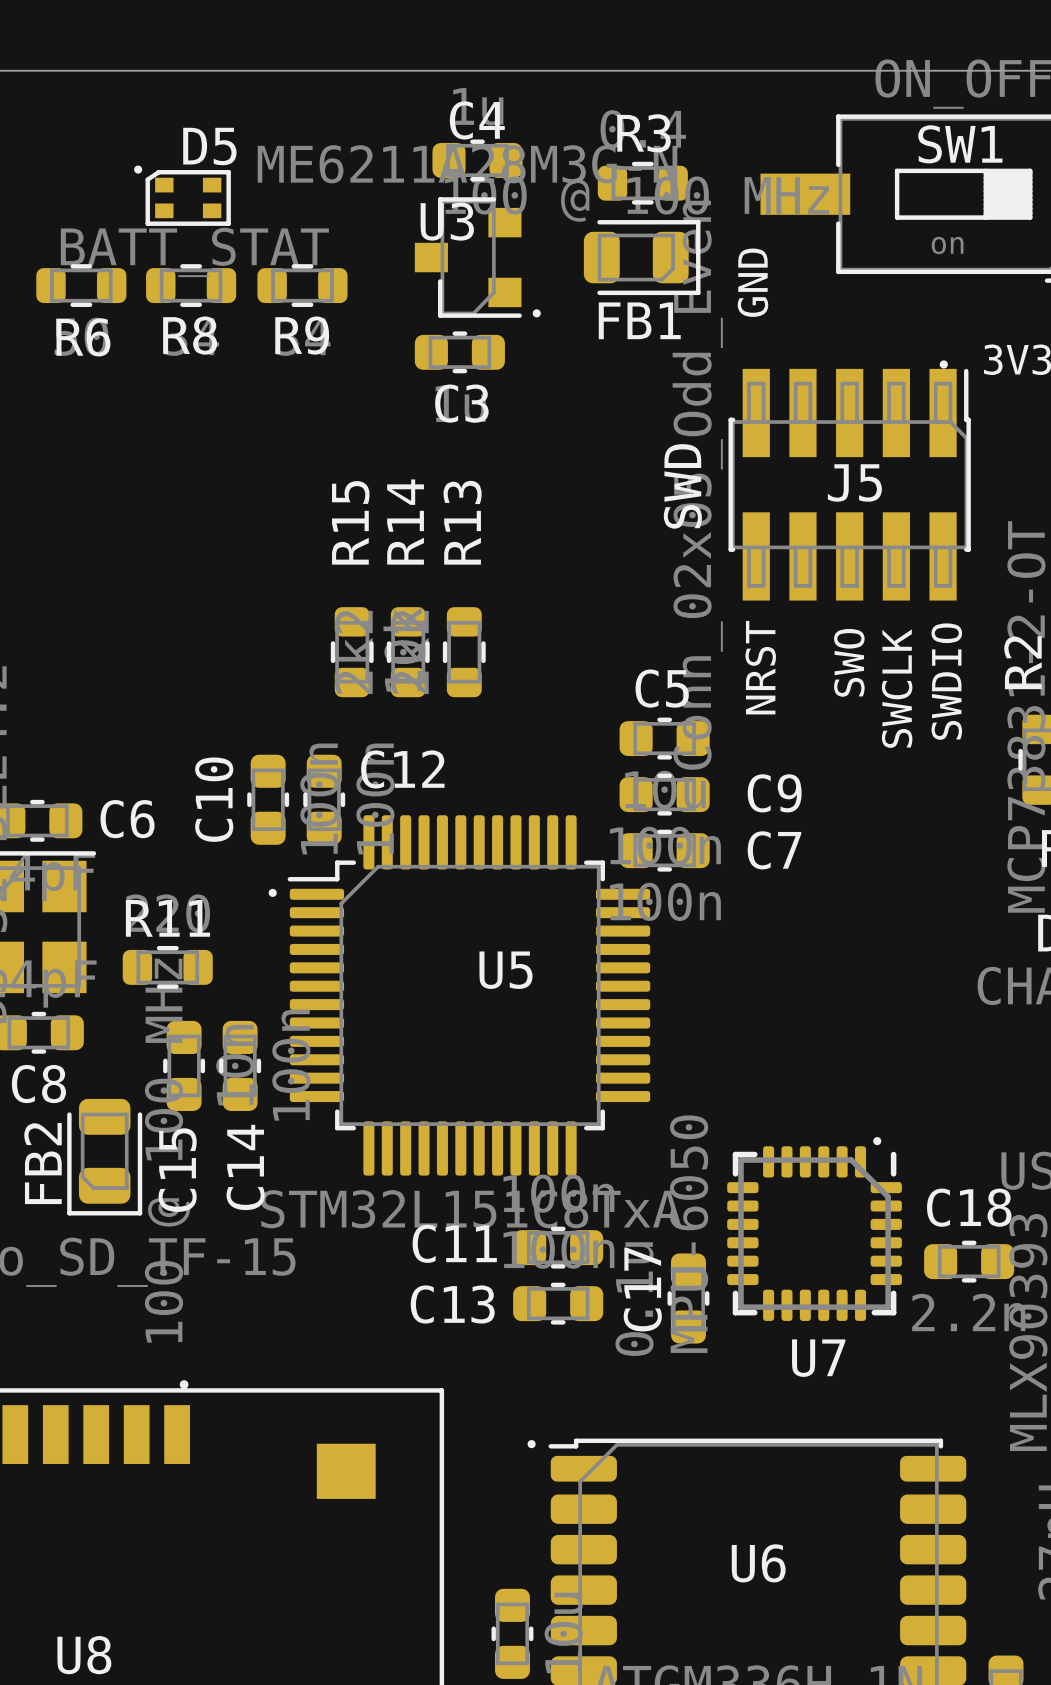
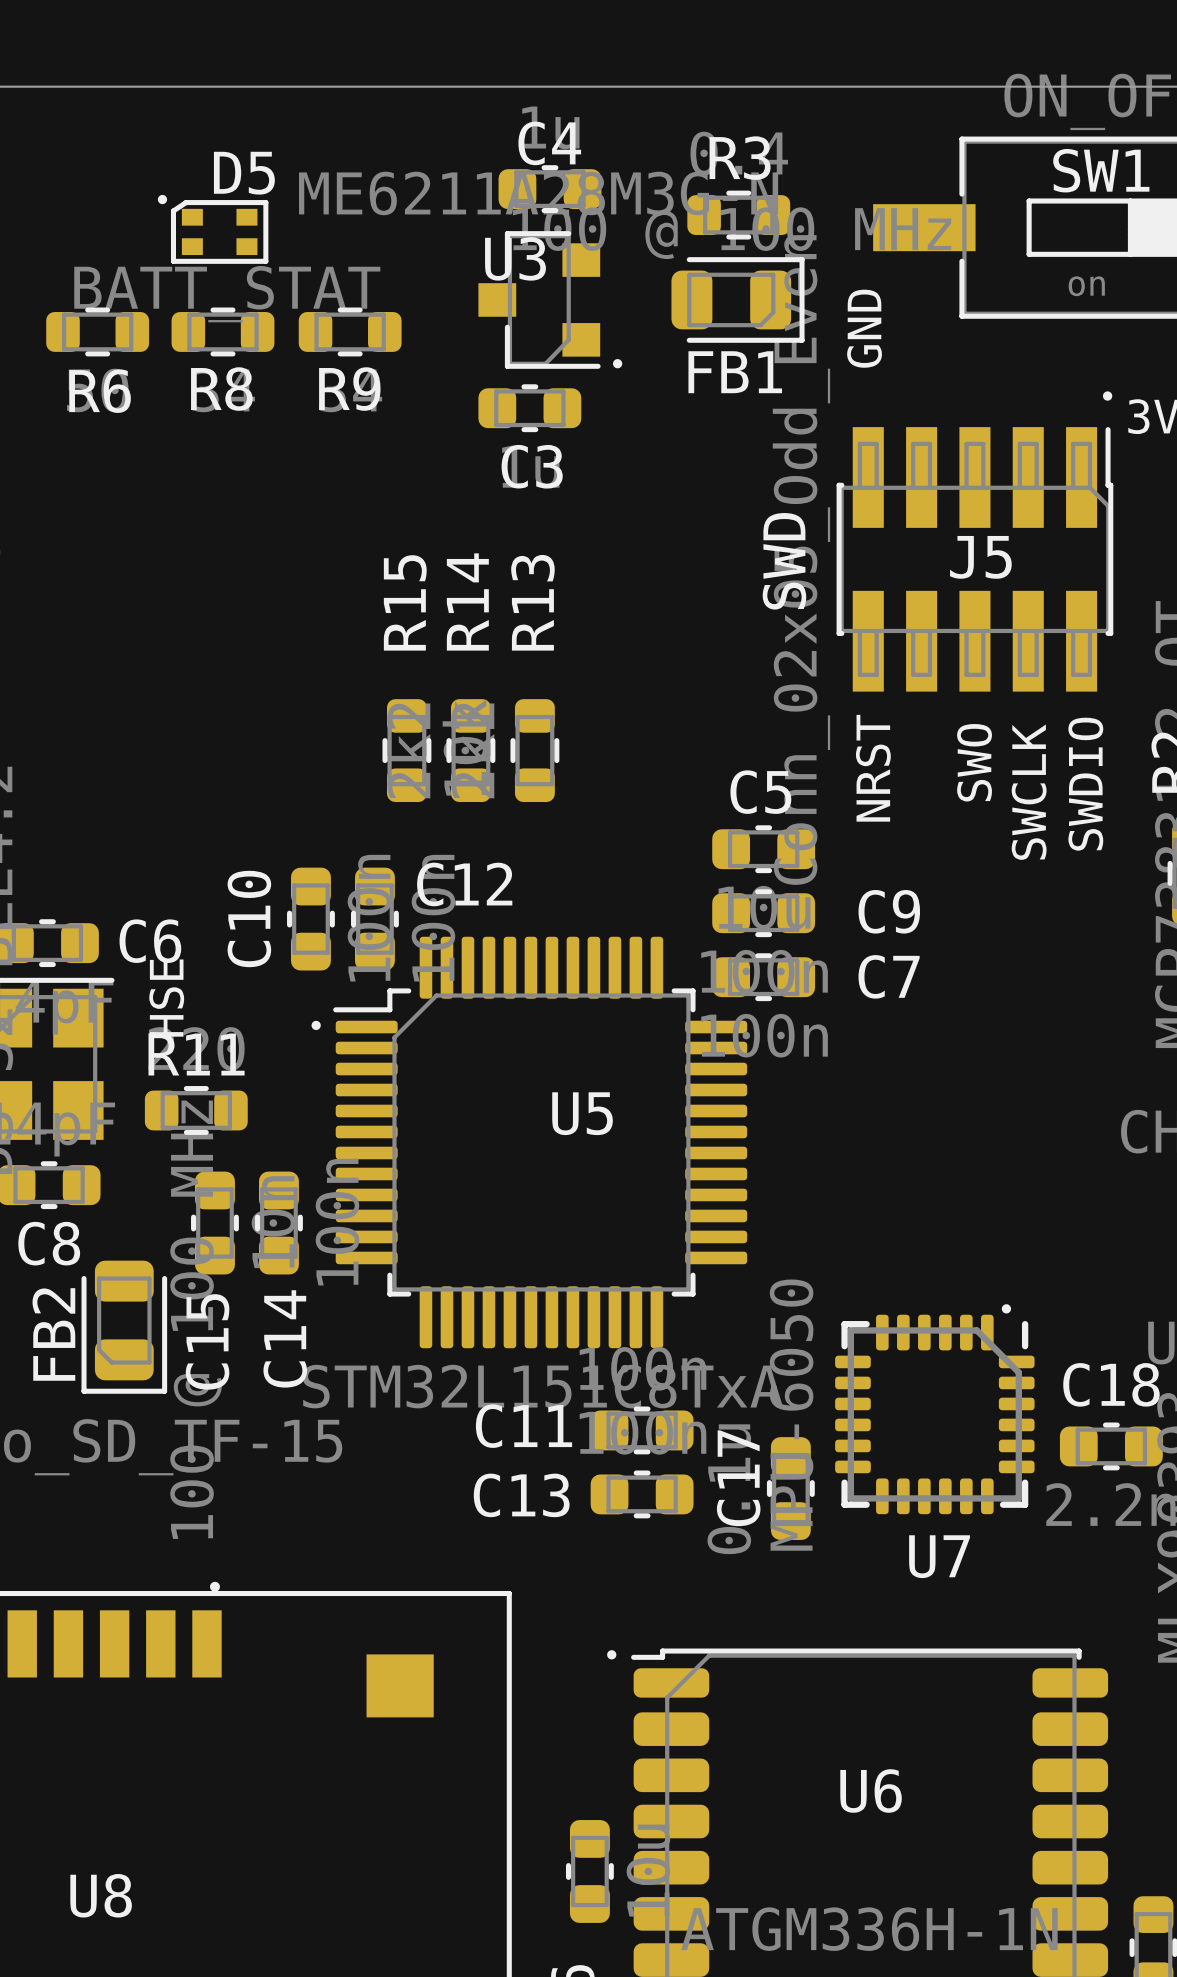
drawing position: (943, 364) -> (1107, 396)
text: none -> HSE (166, 998)

